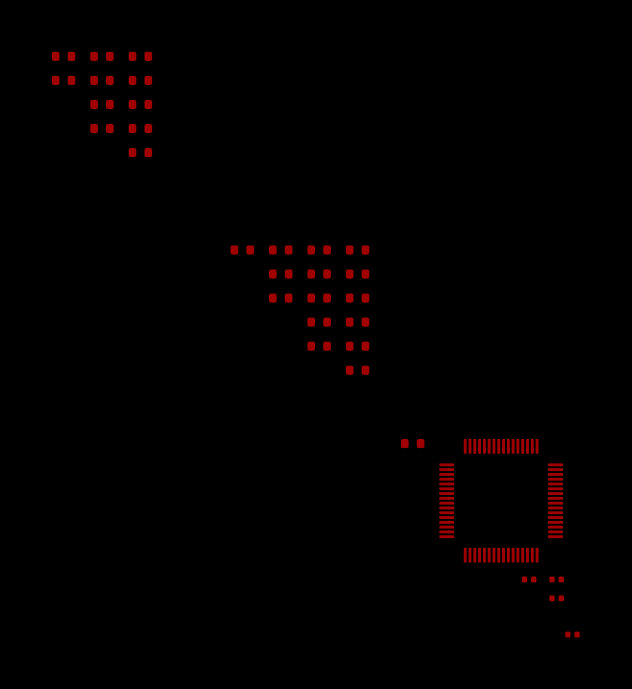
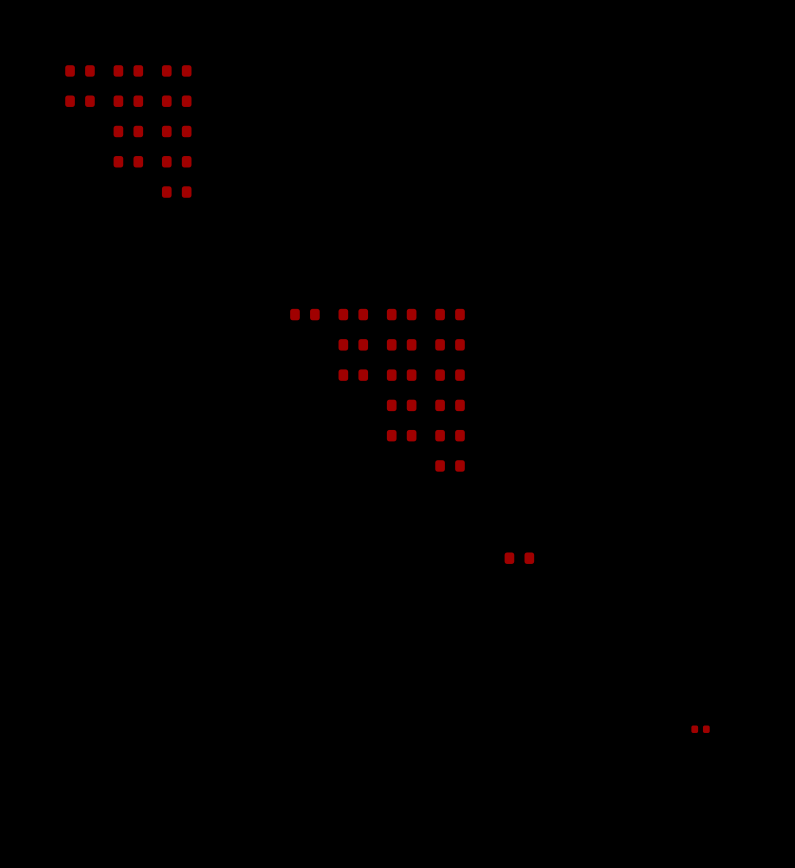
part: (501, 500) -> none
part: (529, 579) -> none
part: (556, 598) -> none
part: (572, 634) -> none

